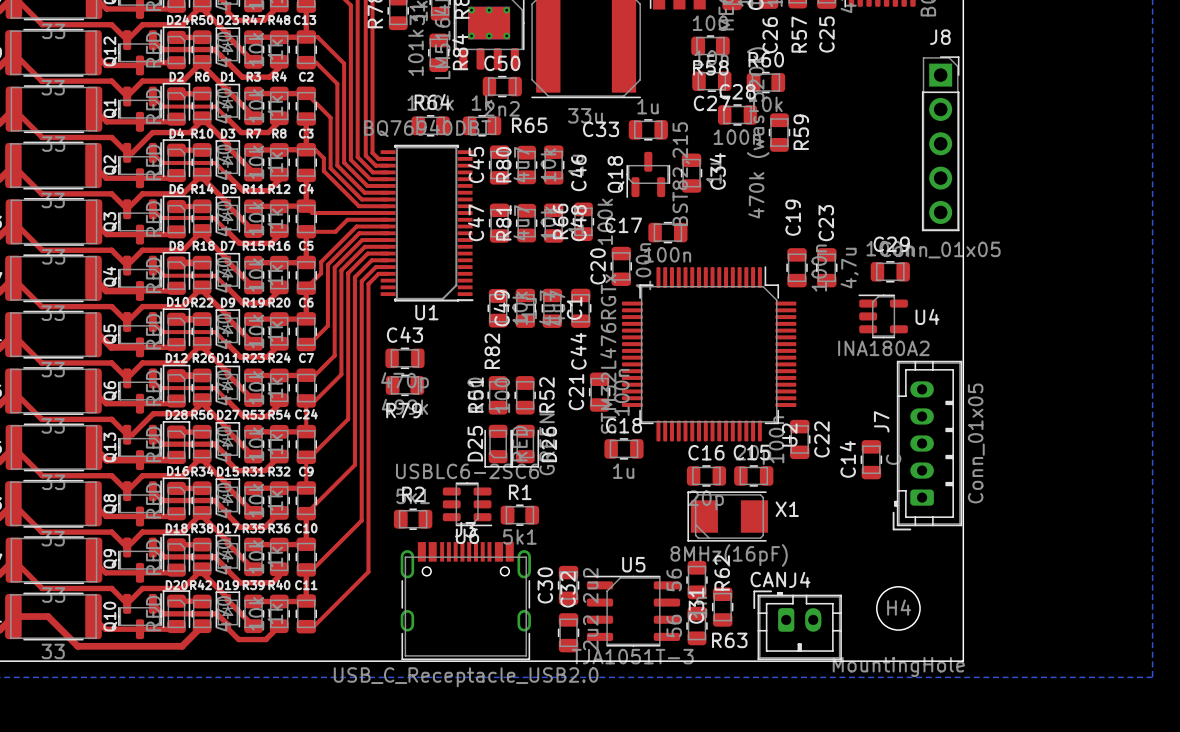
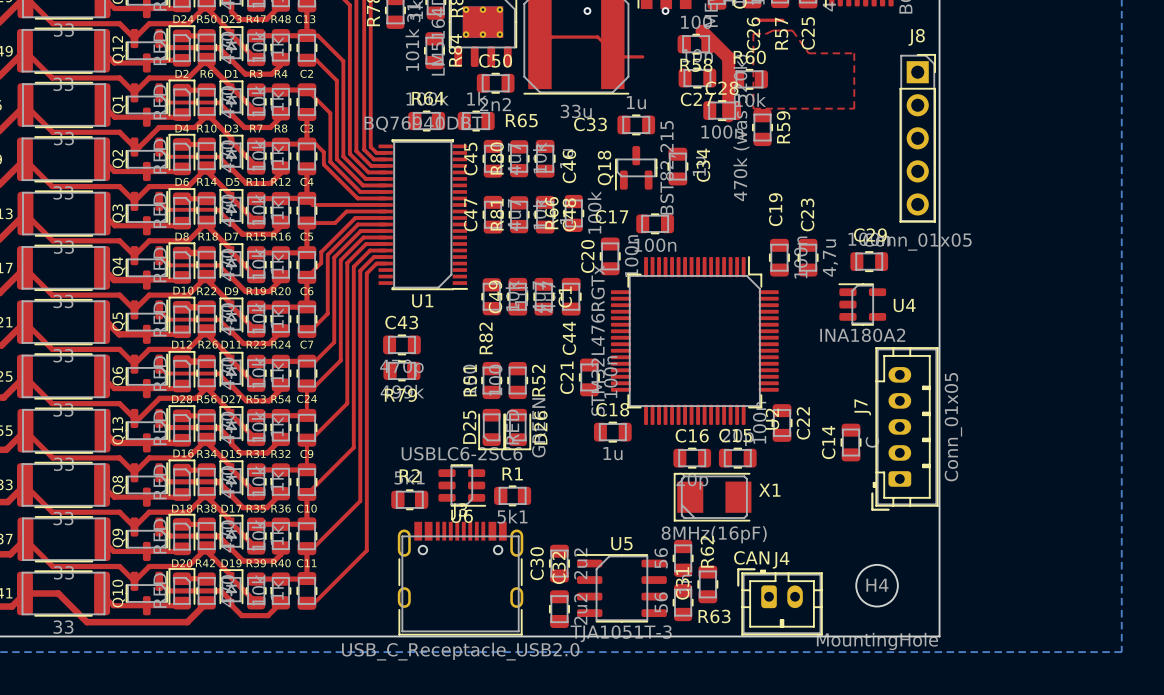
via: none -> (587, 11)
via: none -> (665, 11)
top track: none -> (758, 19) (782, 20)
top zone outline: none -> (772, 30) (766, 33) (753, 33) (753, 108) (854, 108) (854, 53) (808, 53) (792, 30) (772, 30)
top track: none -> (701, 31) (728, 57) (728, 115)
top track: none -> (642, 56) (617, 56) (597, 37) (551, 37) (542, 46) (542, 78) (544, 80)

